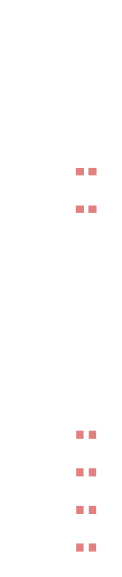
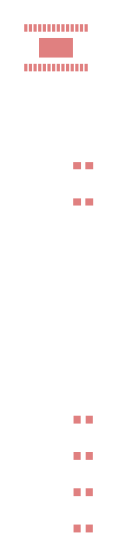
part: none -> (55, 47)

